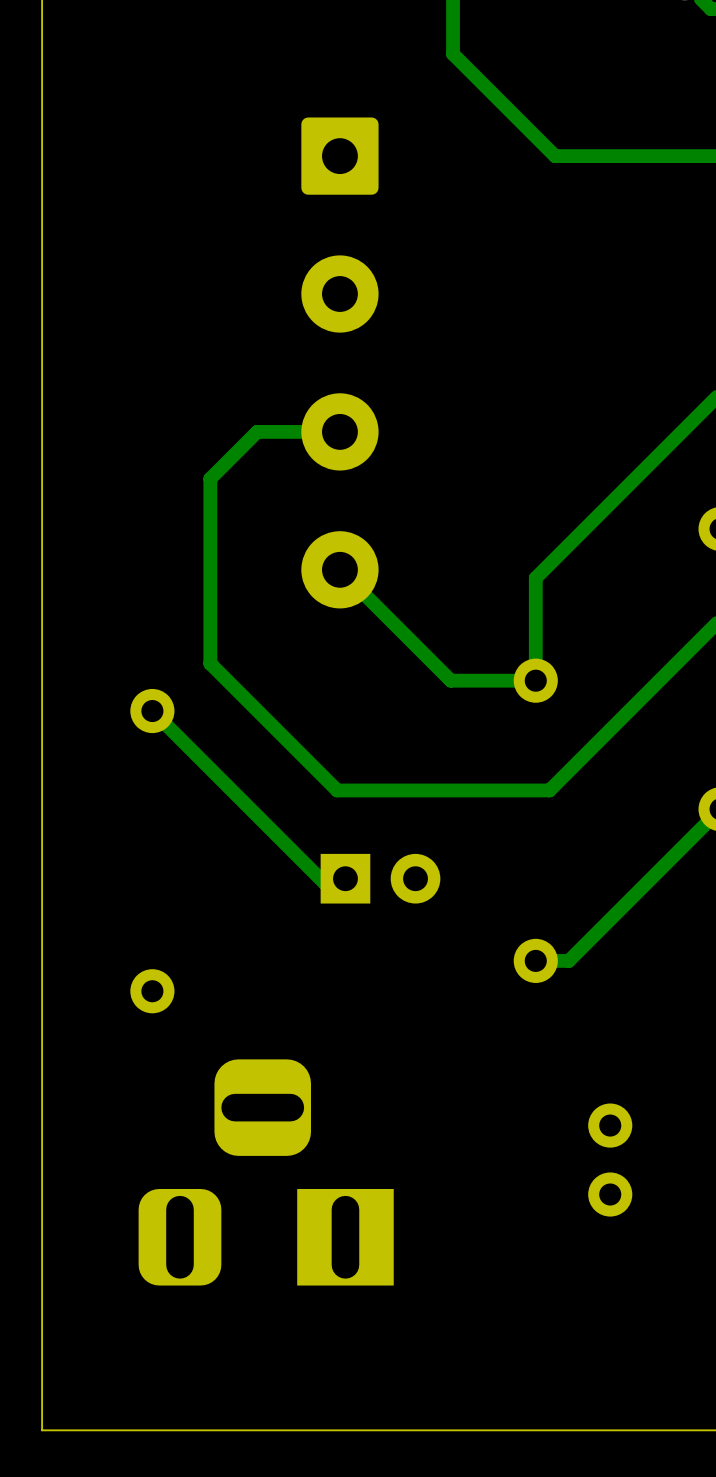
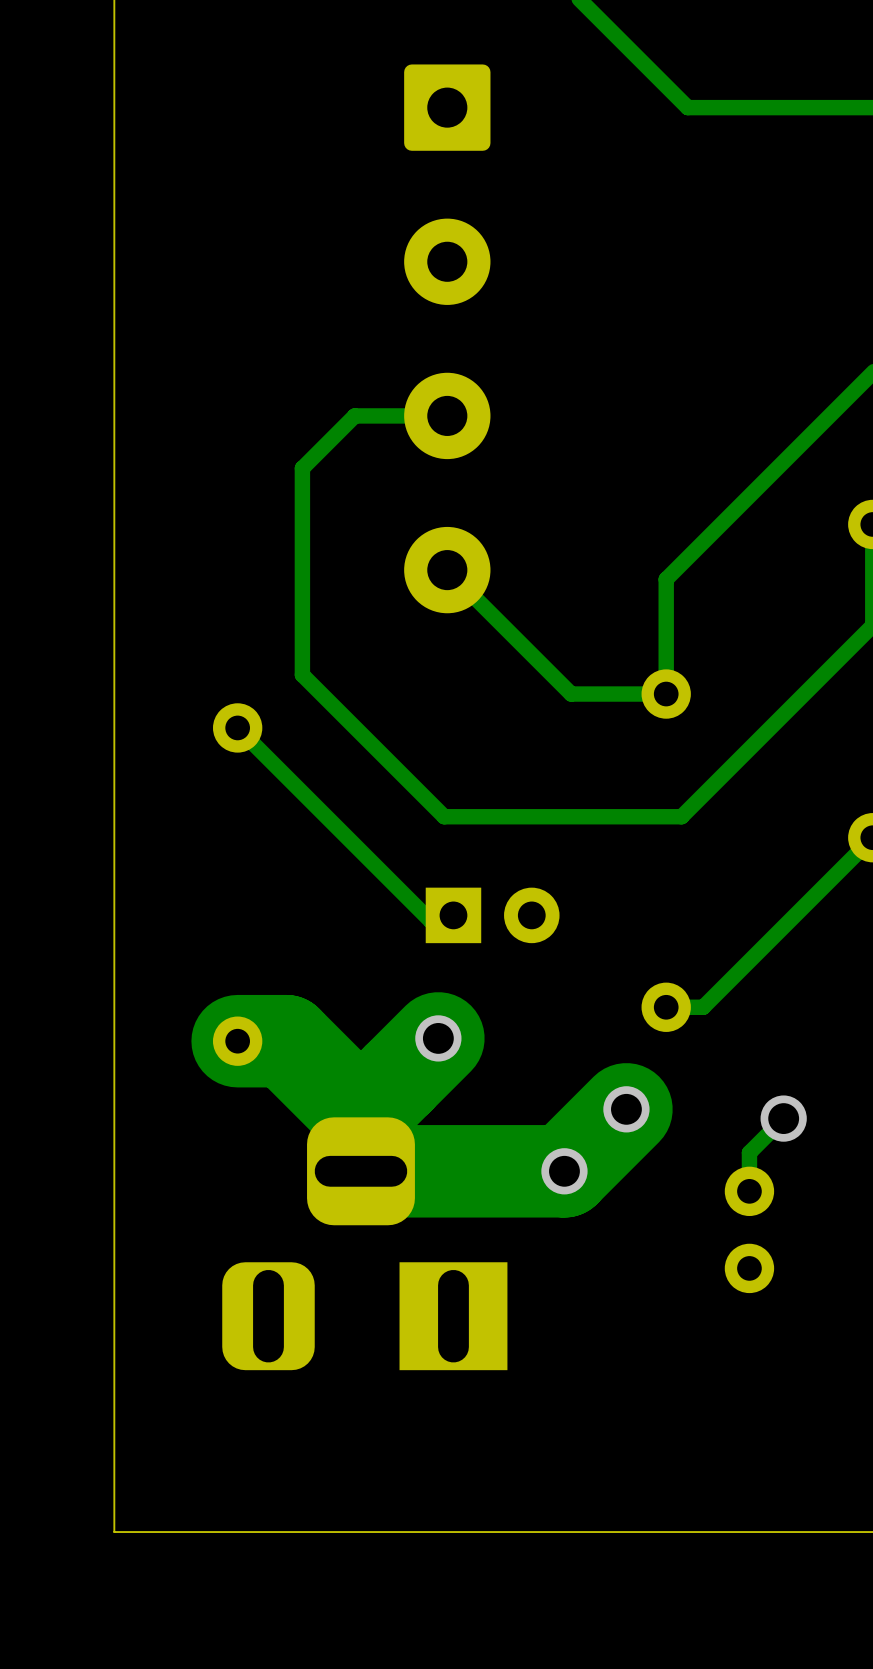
track: none -> (438, 1038) (360, 1115)
via: none -> (438, 1038)
track: none -> (237, 1041) (286, 1041) (360, 1115)
track: none -> (626, 1109) (564, 1171) (360, 1171) (360, 1115)
via: none -> (626, 1109)
track: none -> (783, 1118) (749, 1152) (749, 1191)
via: none -> (783, 1118)
via: none -> (564, 1171)

